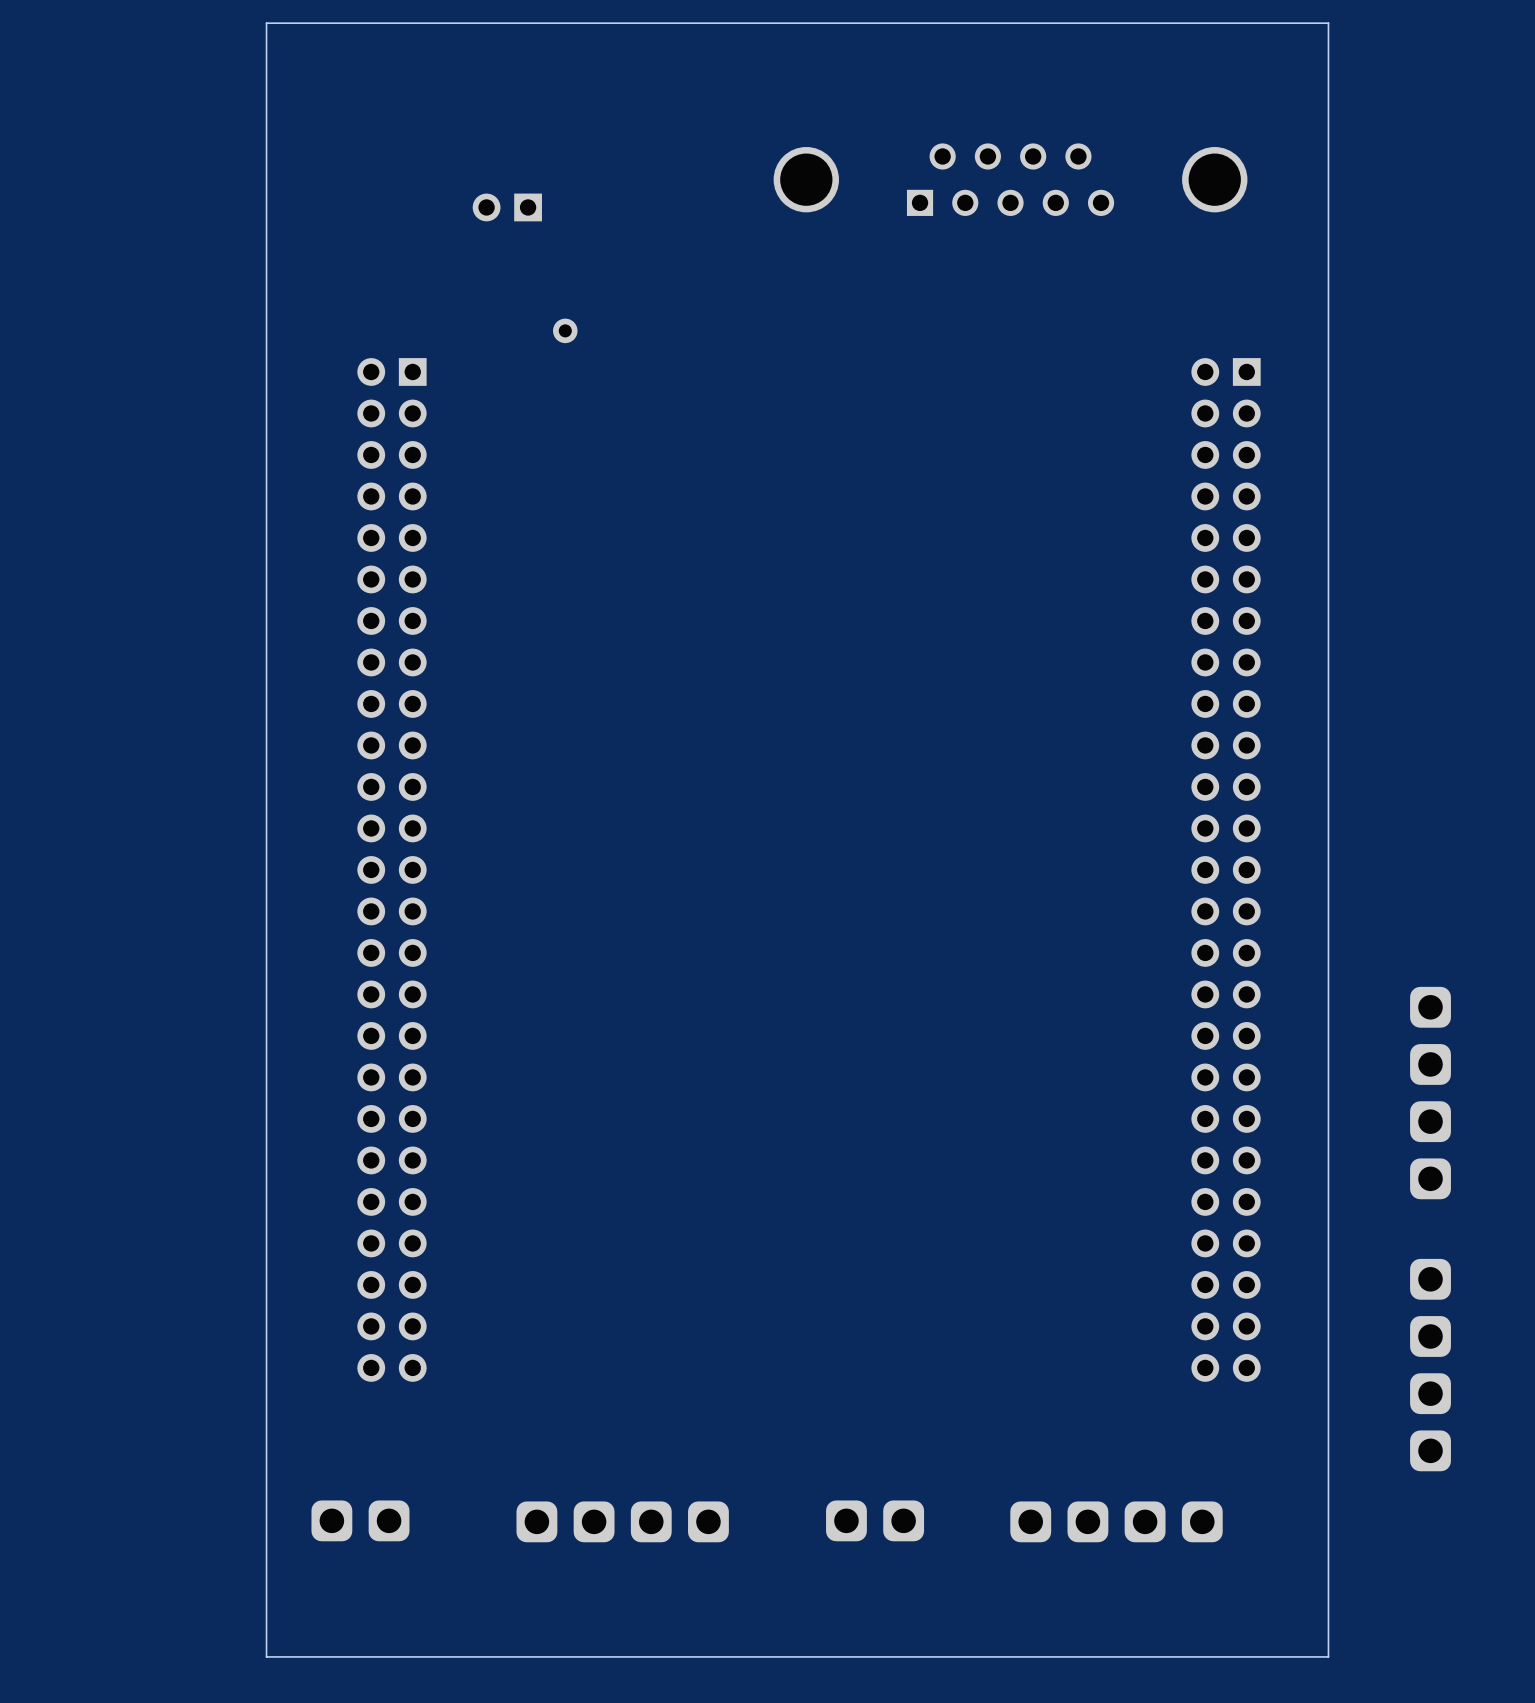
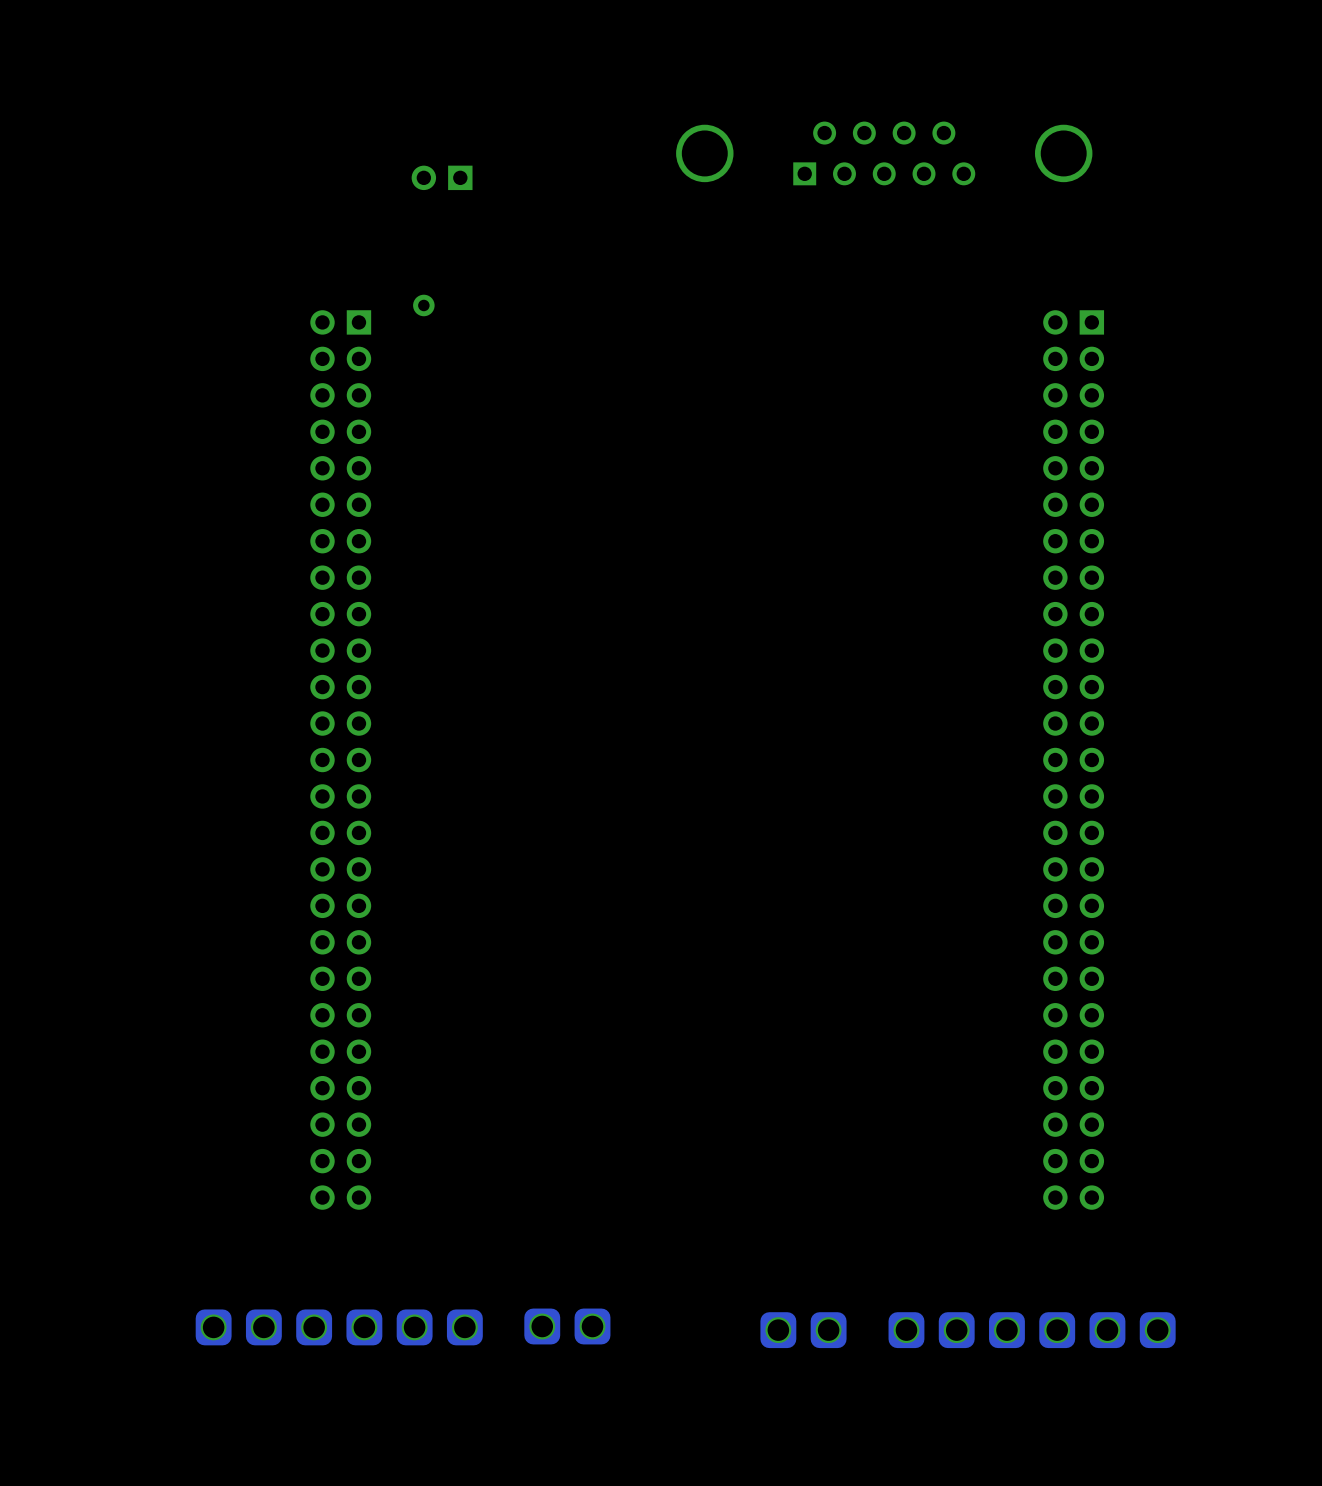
board edge: (1328, 23) (1328, 1656) (266, 1656) (266, 23) (1328, 23) -> none
part position: (565, 330) -> (423, 305)
part: (1430, 1093) -> none
part: (1430, 1365) -> none
part: none -> (567, 1326)
part: none -> (339, 1327)
part: none -> (1032, 1330)
part: (360, 1520) -> none
part position: (875, 1520) -> (803, 1330)
part: (622, 1521) -> none
part: (1116, 1521) -> none

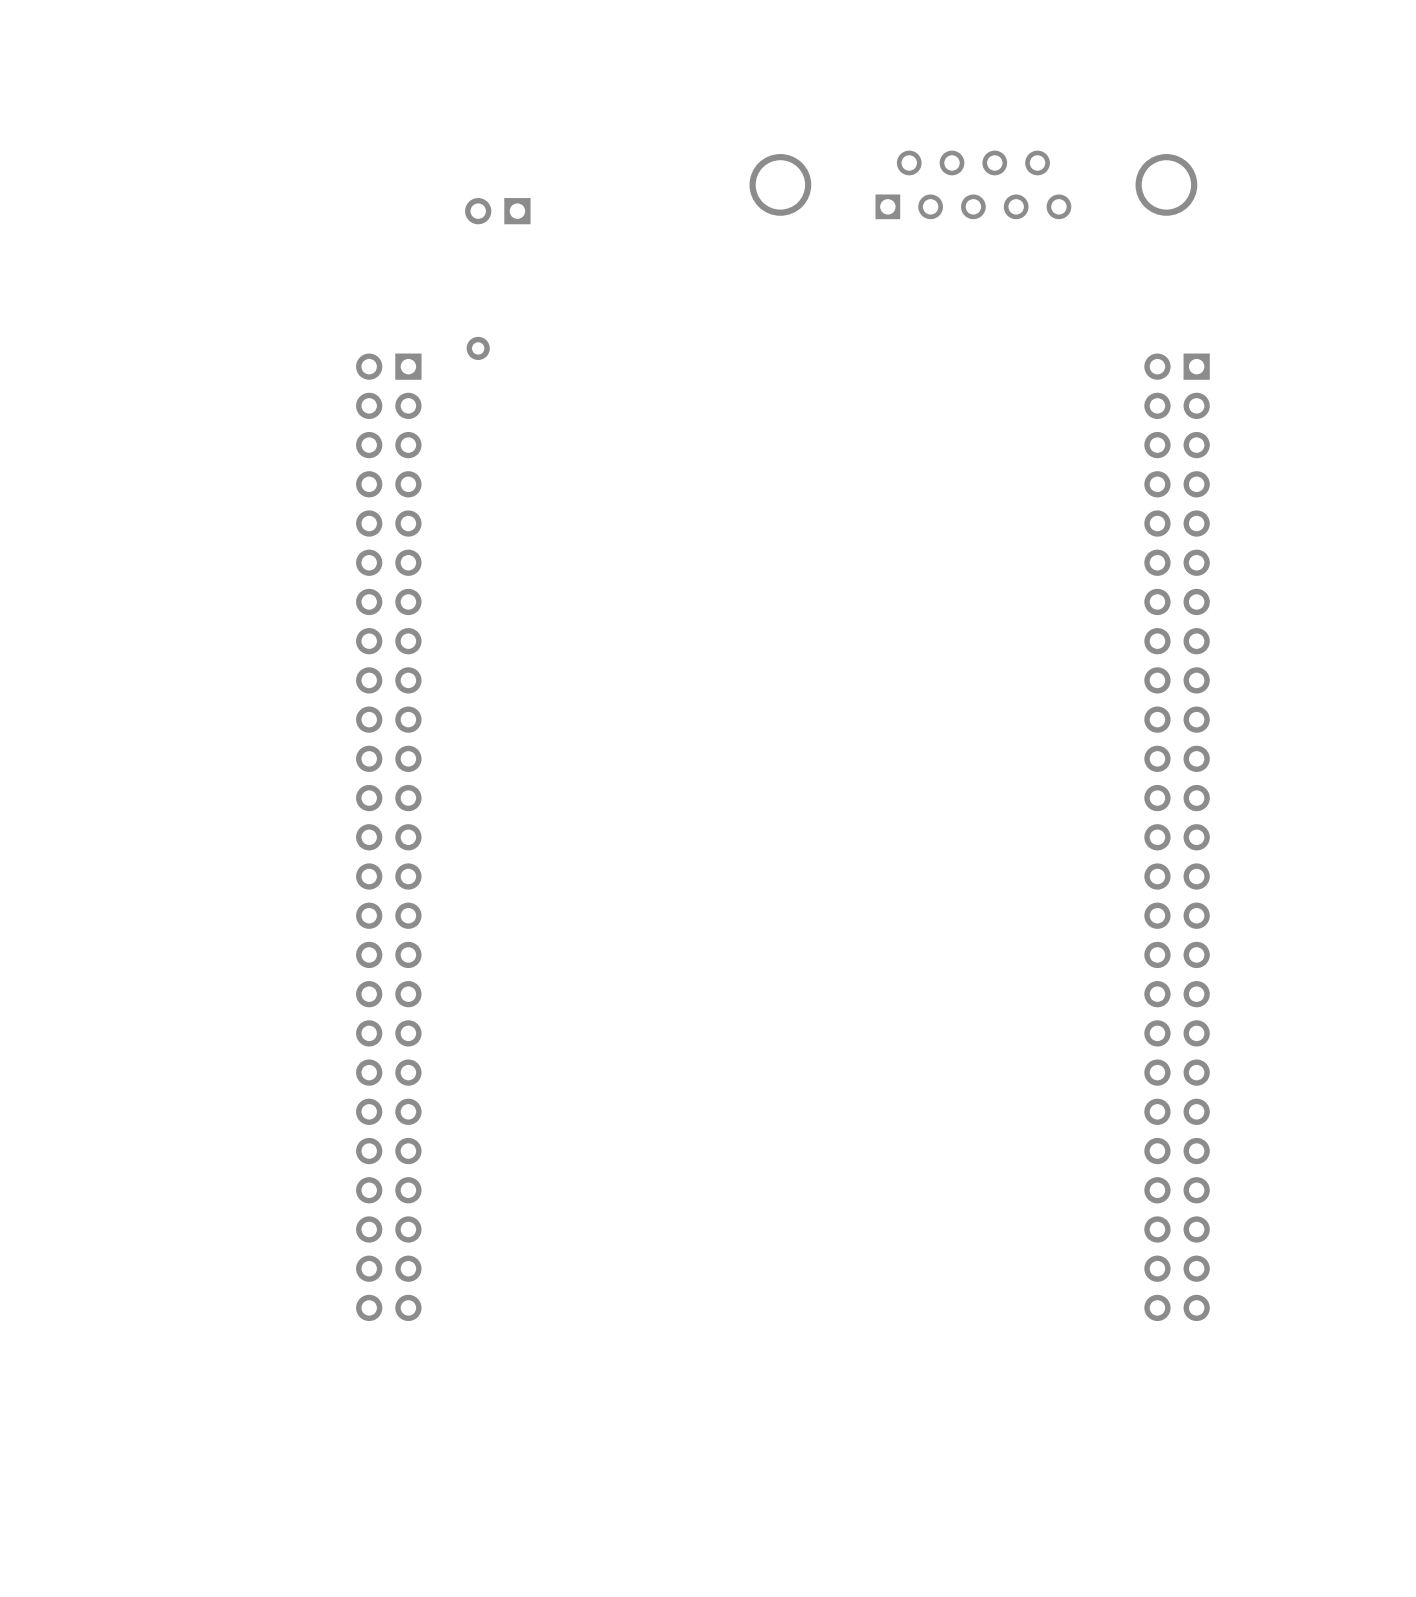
part: (567, 1326) -> none
part: (339, 1327) -> none
part: (803, 1330) -> none
part: (1032, 1330) -> none

